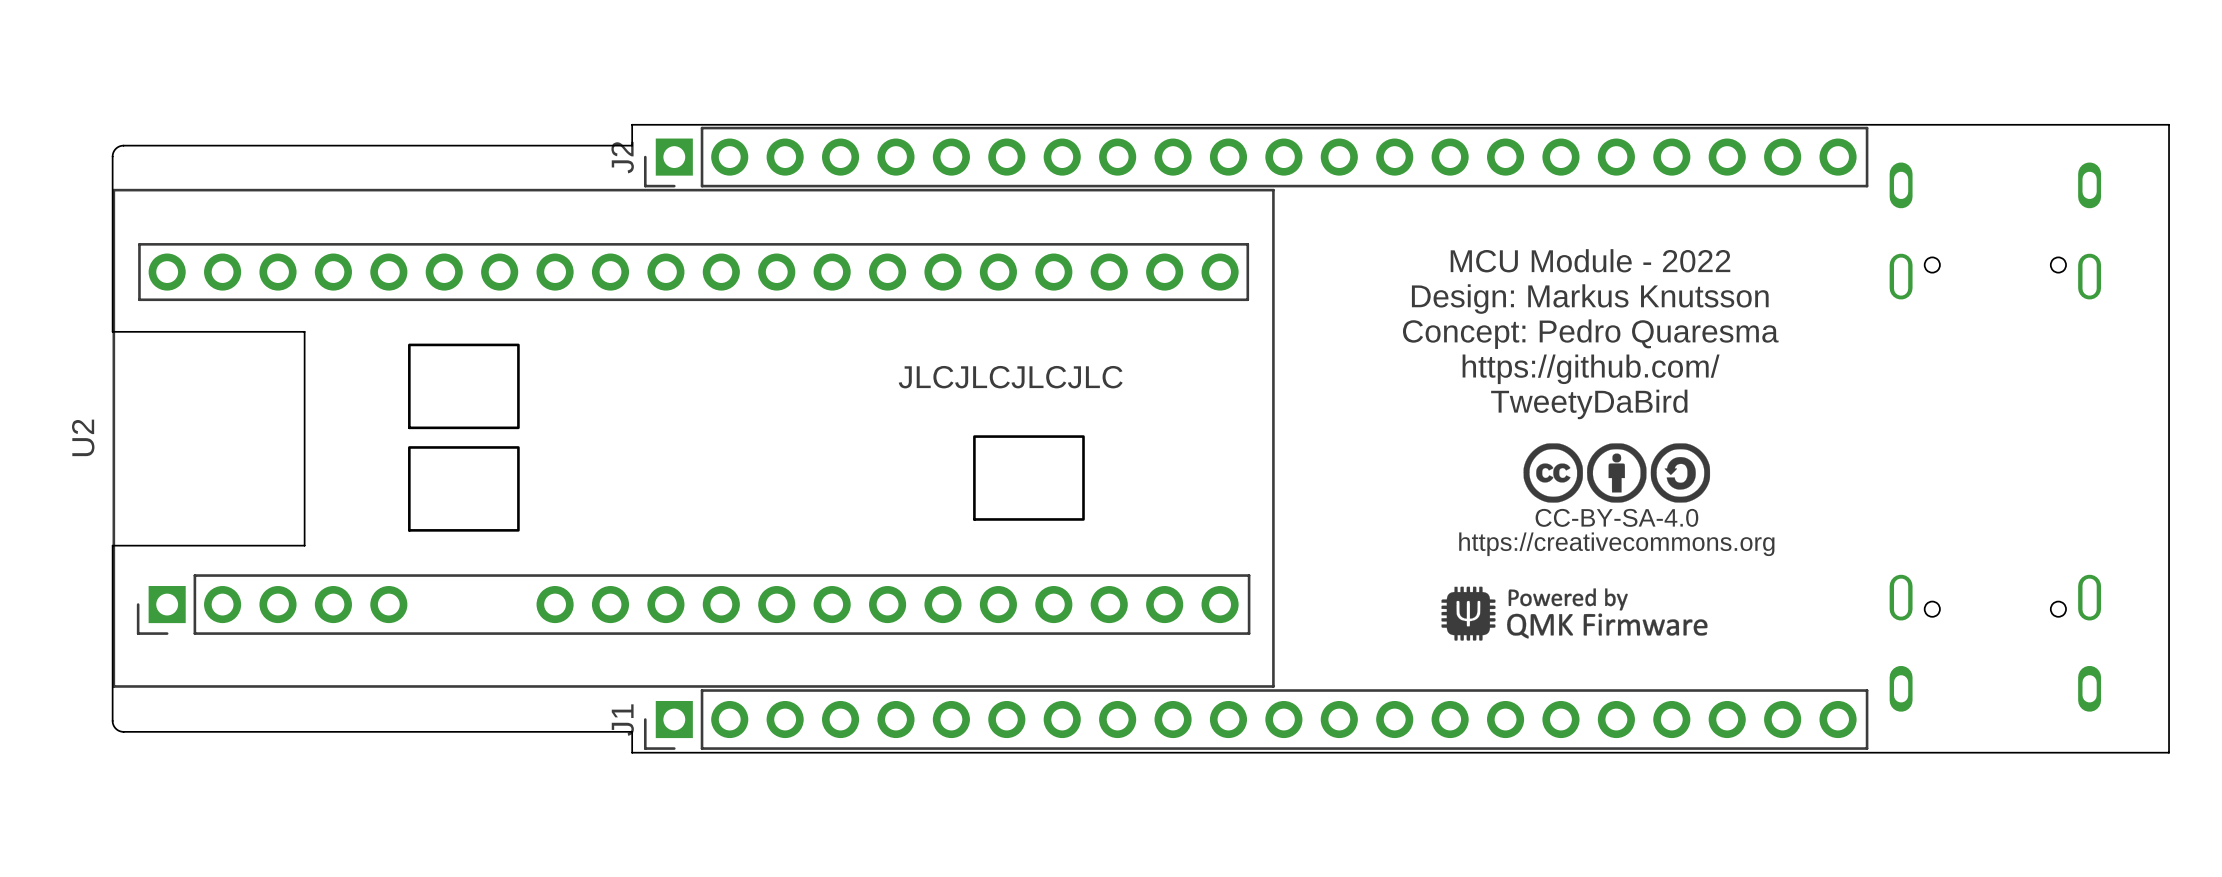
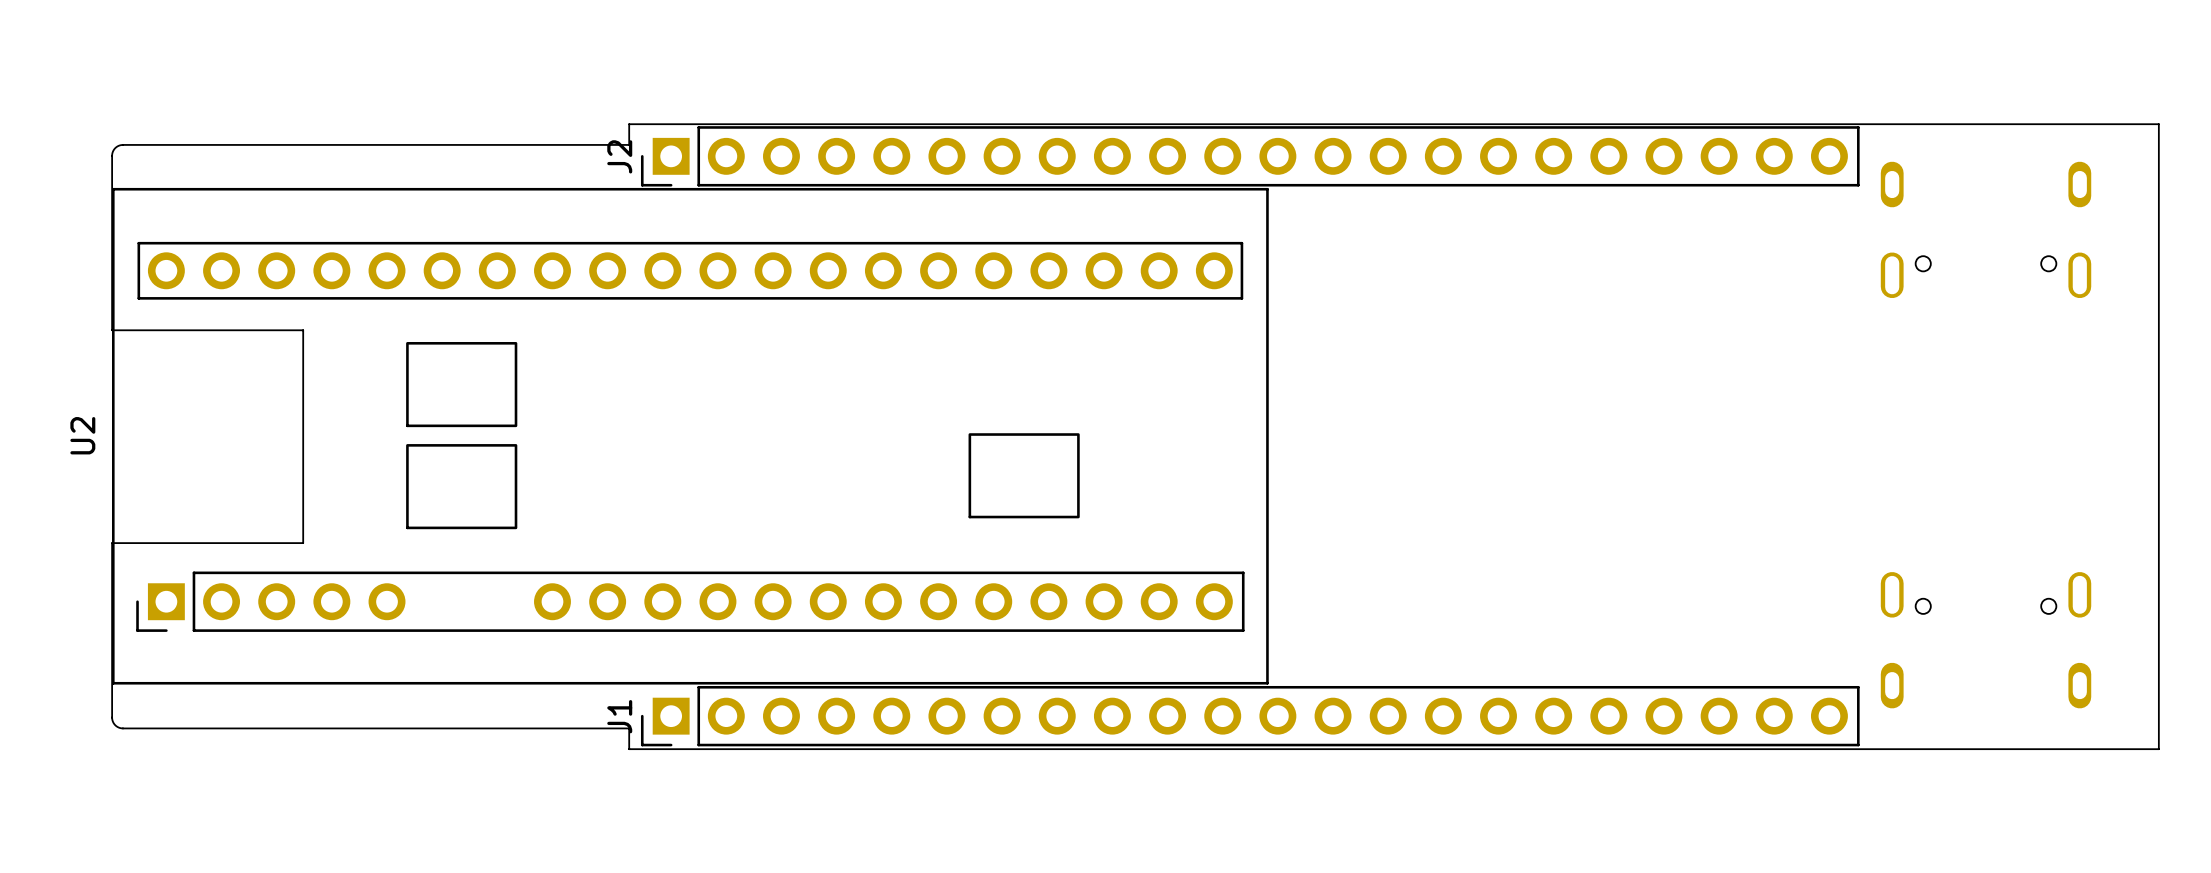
text: MCU Module - 2022 (1590, 260) -> none
text: Design: Markus Knutsson (1590, 299) -> none
text: Concept: Pedro Quaresma (1590, 334) -> none
text: https://github.com/ (1591, 369) -> none
text: JLCJLCJLCJLC (1010, 377) -> none
text: TweetyDaBird (1589, 404) -> none
drawing: [1441, 443, 1711, 641] -> none

